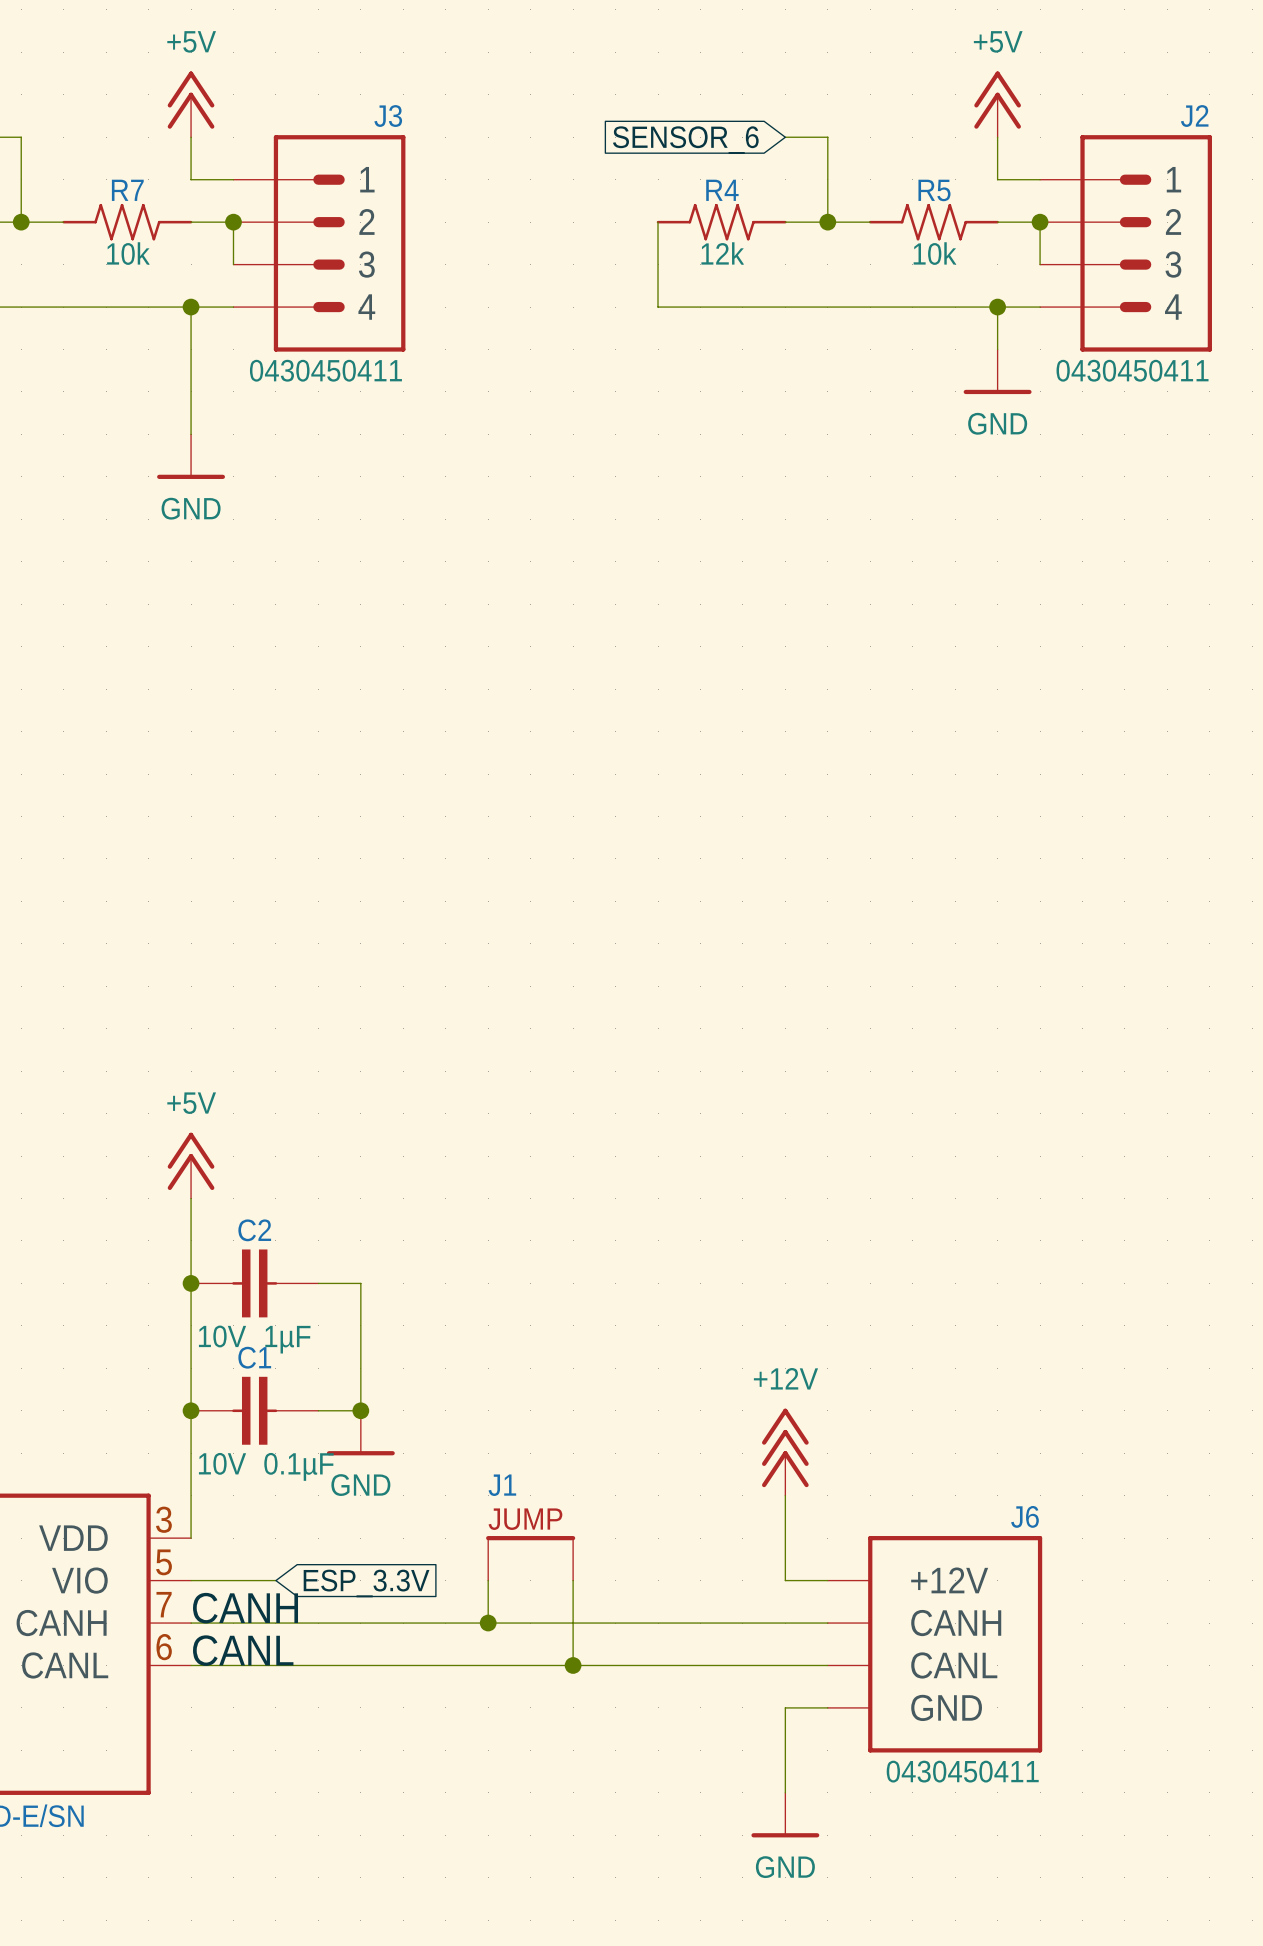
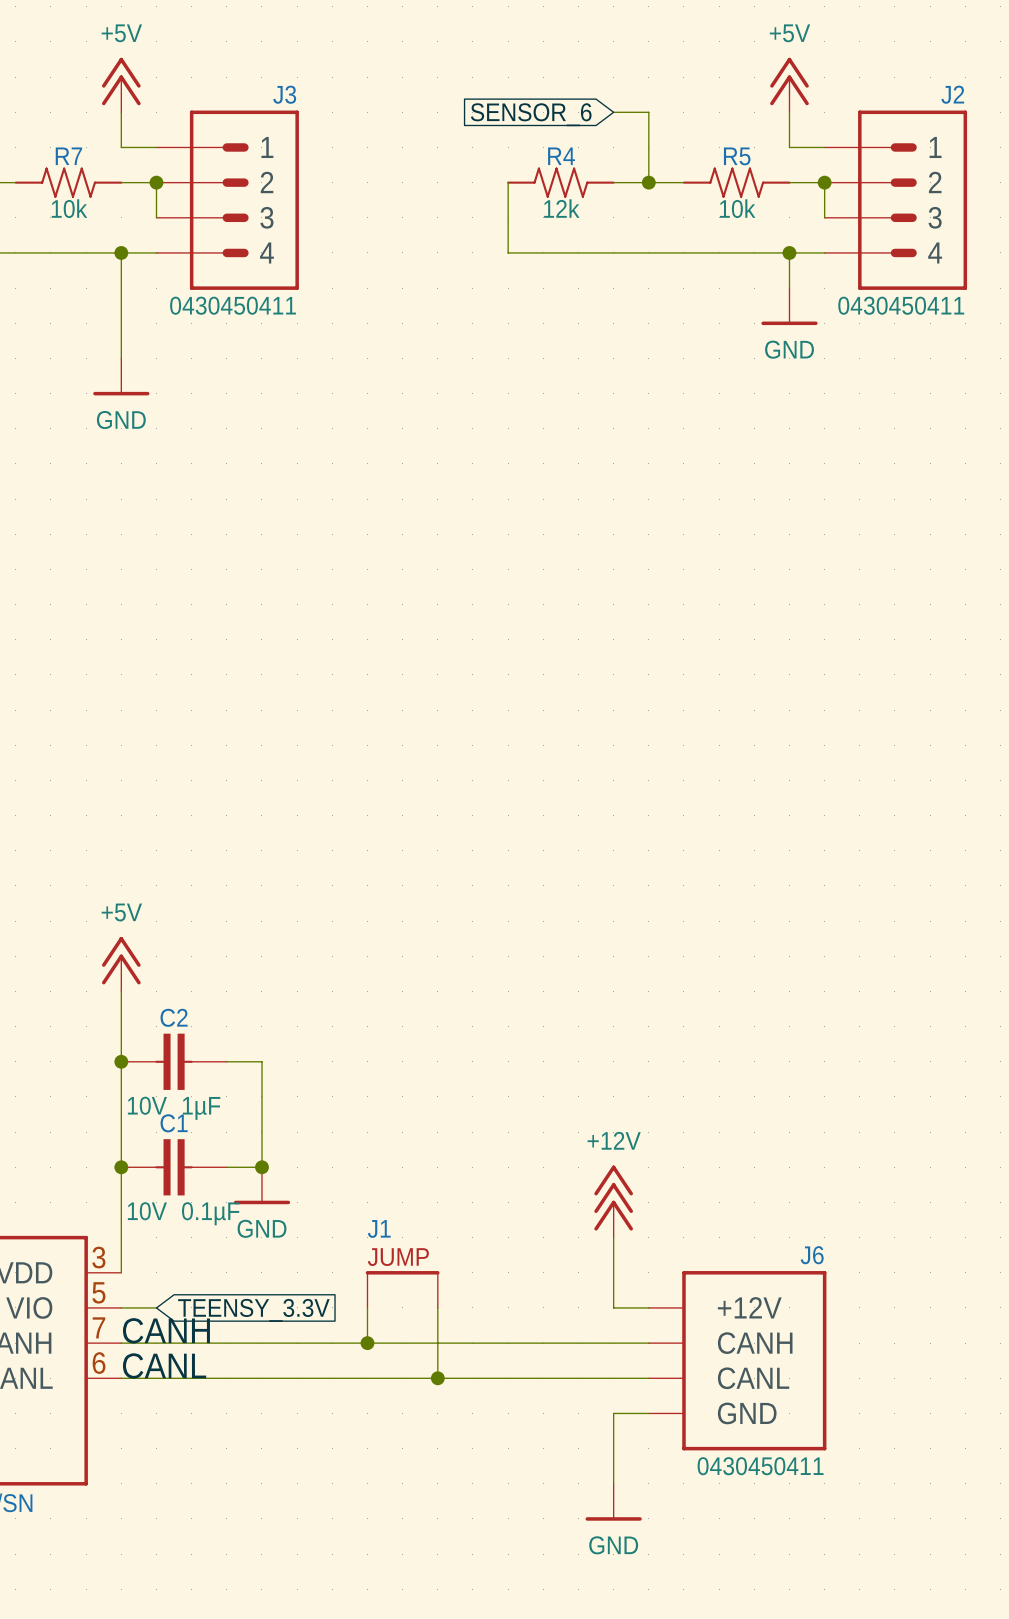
wire: (233, 1580) (275, 1580) -> none
global label: ESP_3.3V (366, 1583) -> TEENSY_3.3V (253, 1310)

